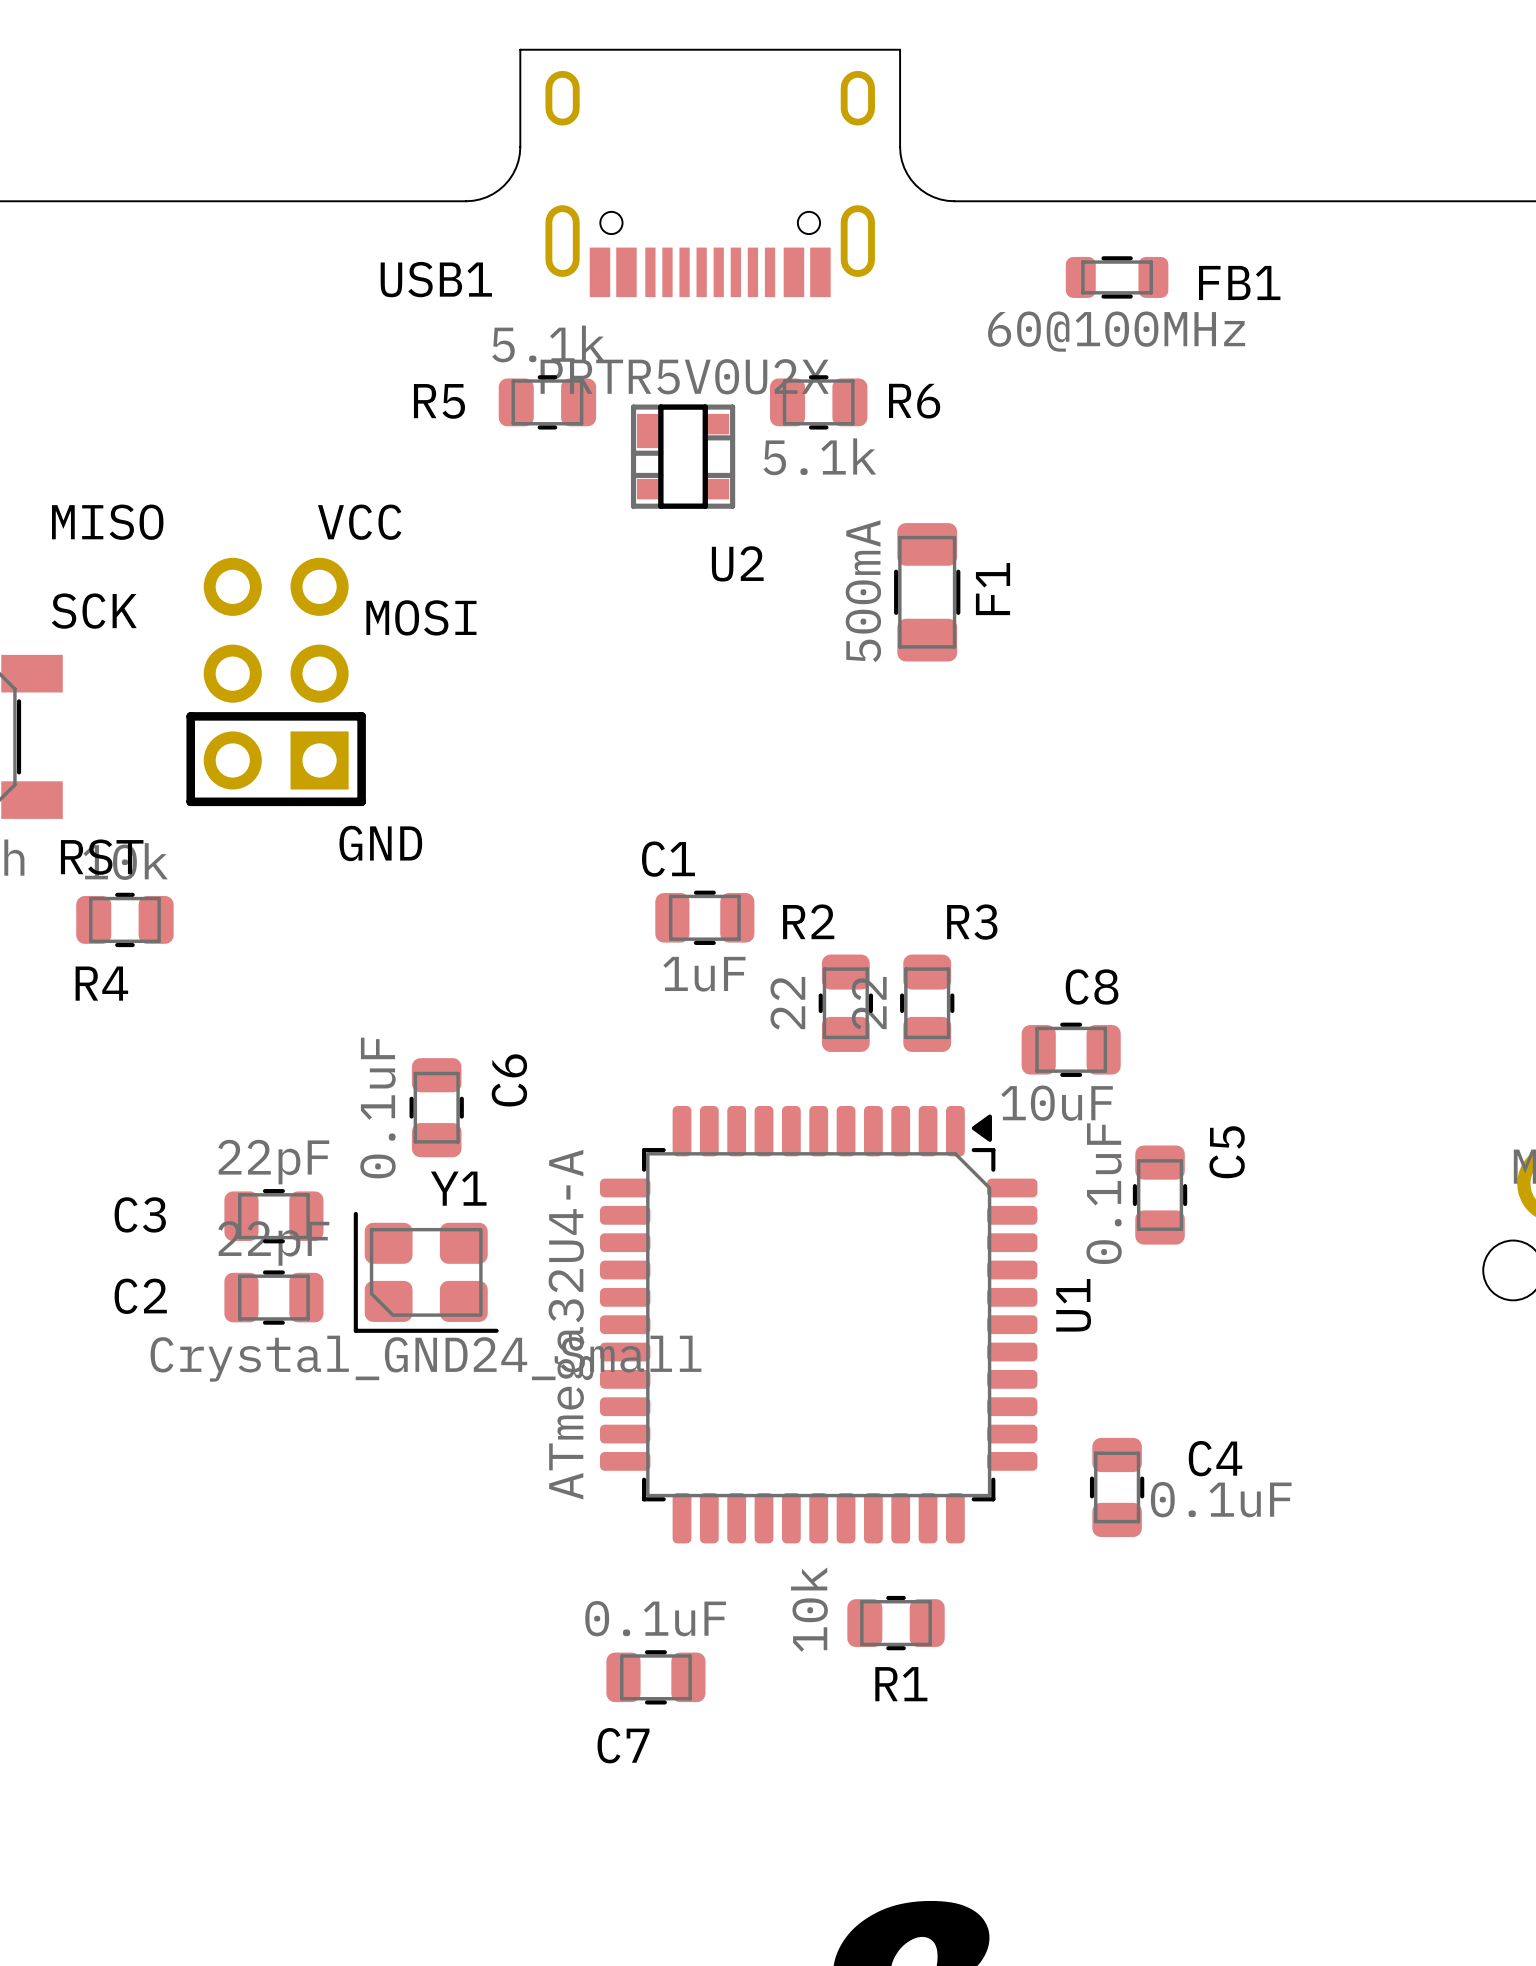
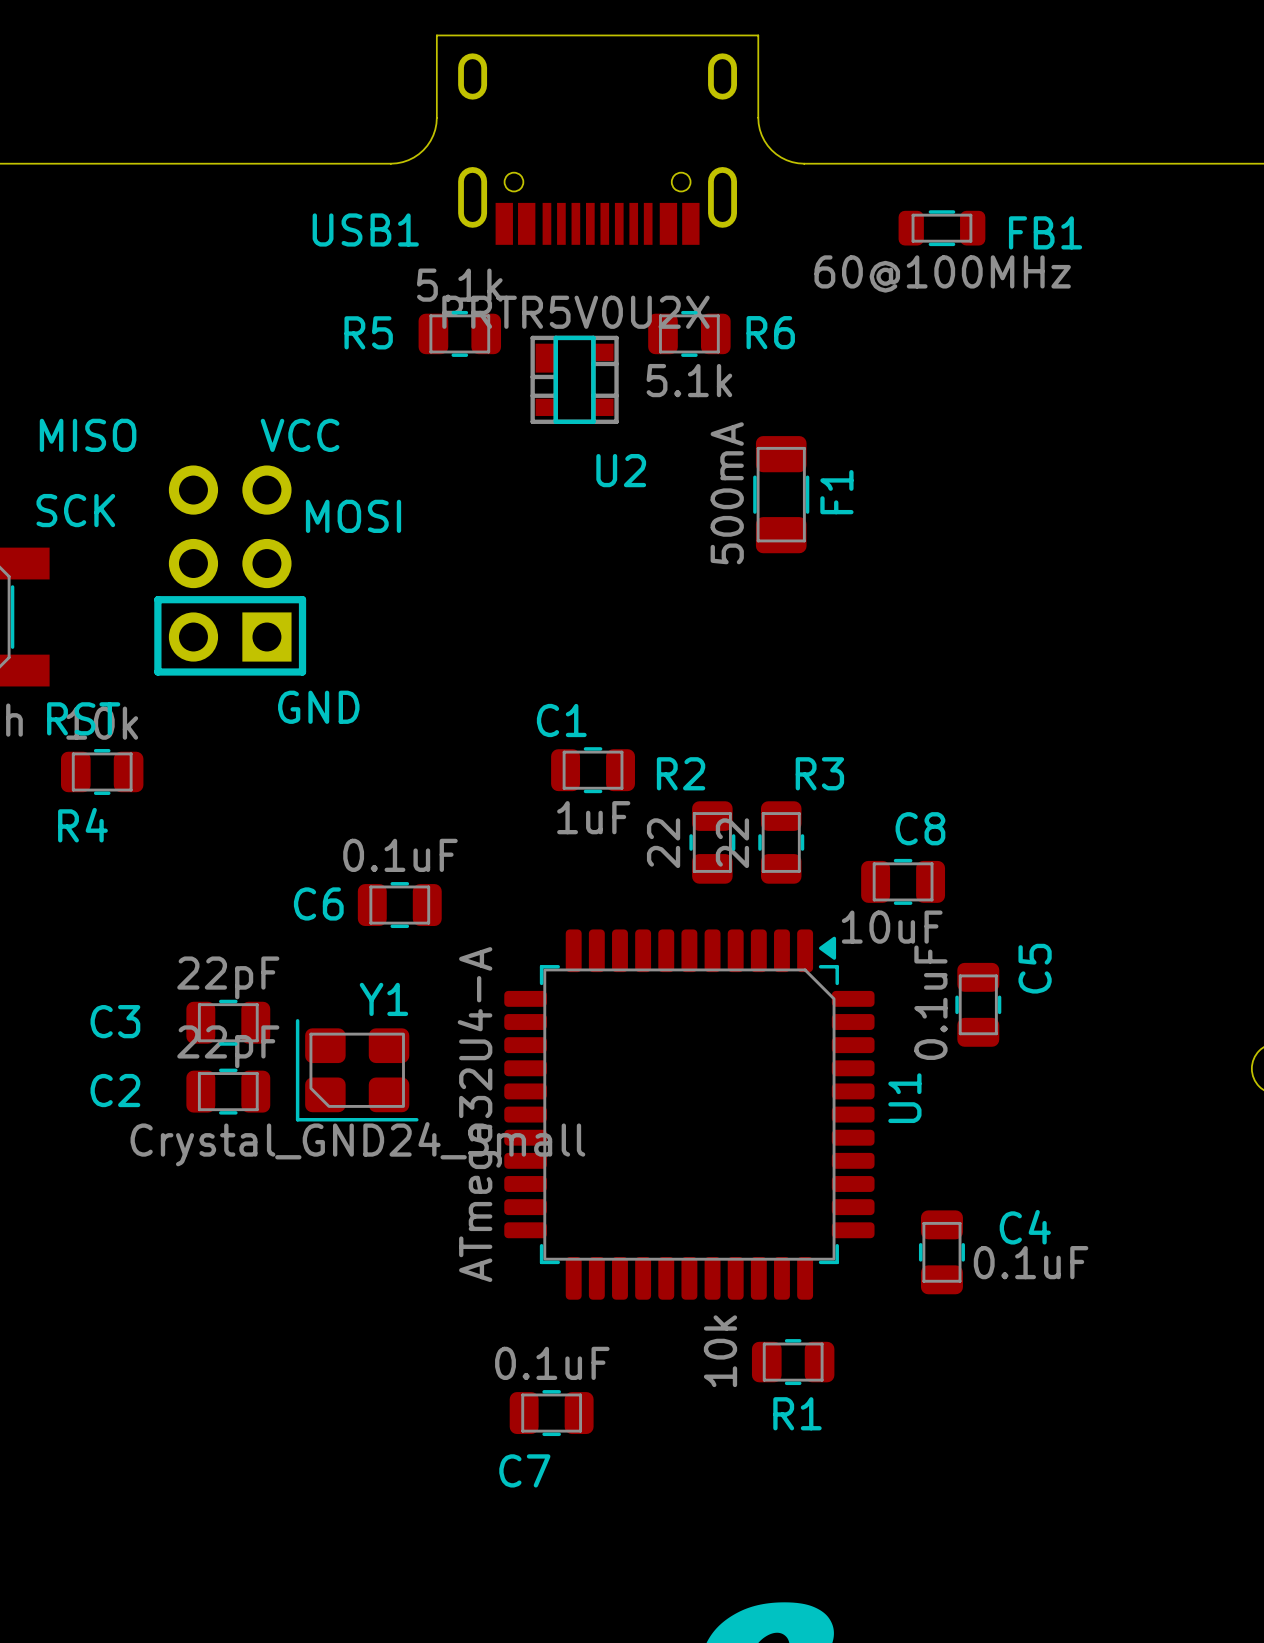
C6 name position: C6 (509, 1080) -> C6 (318, 903)
C6 rotation: 0° (436, 1107) -> 90° clockwise (399, 905)
R1 position: (896, 1623) -> (793, 1362)

